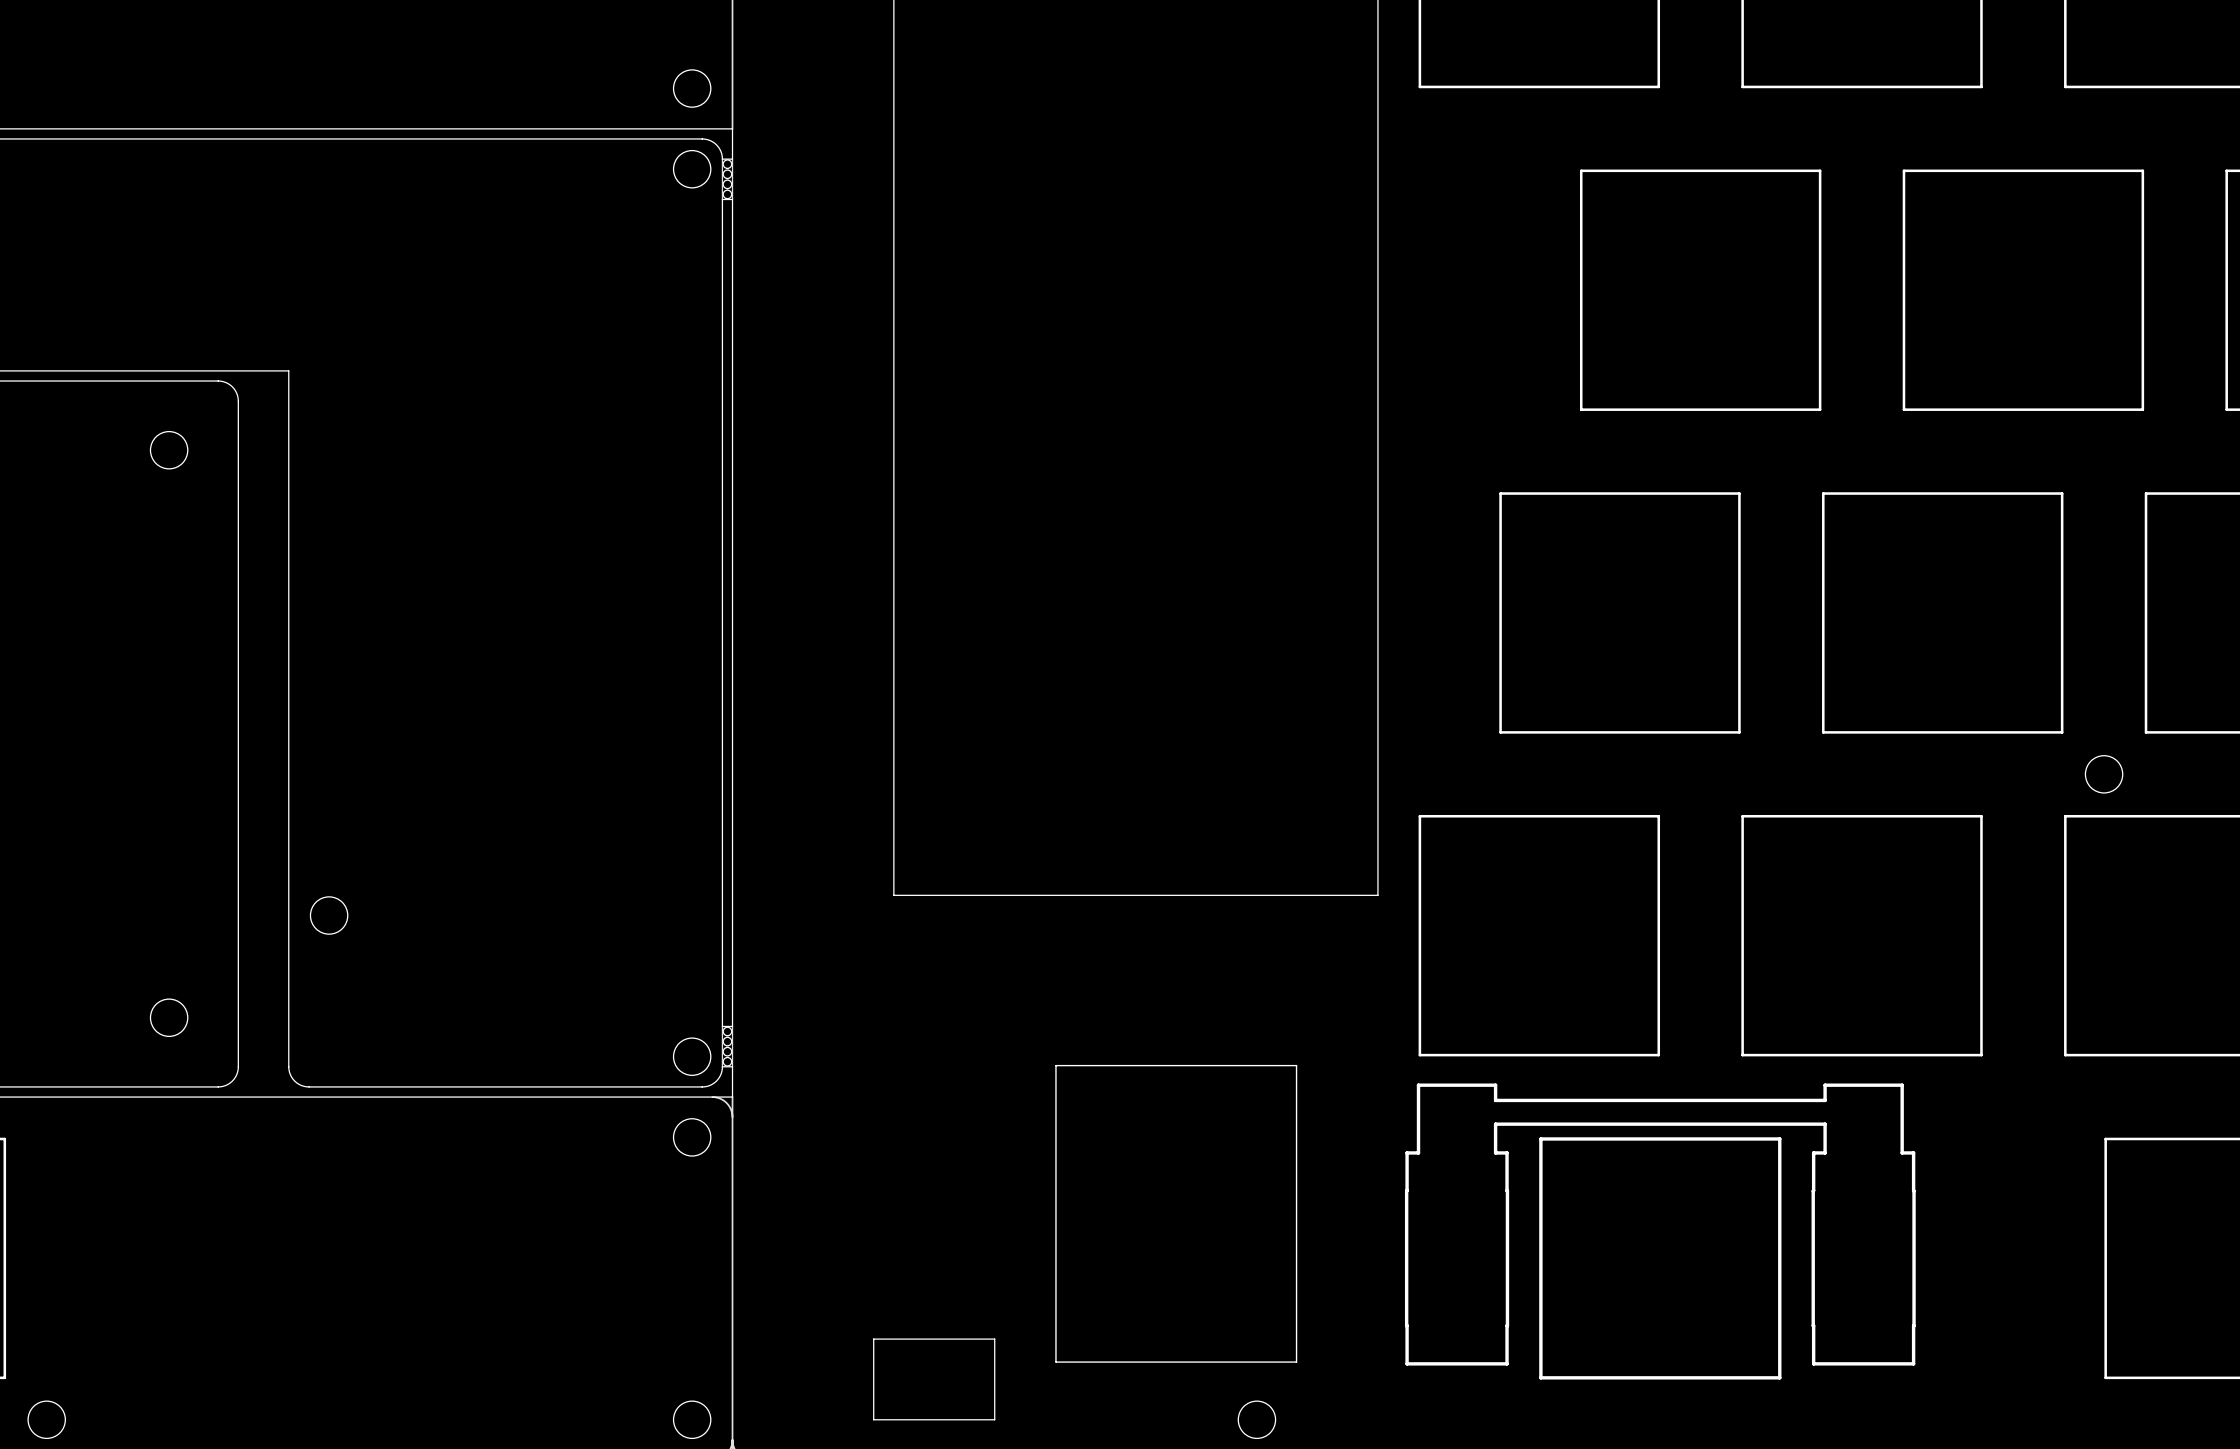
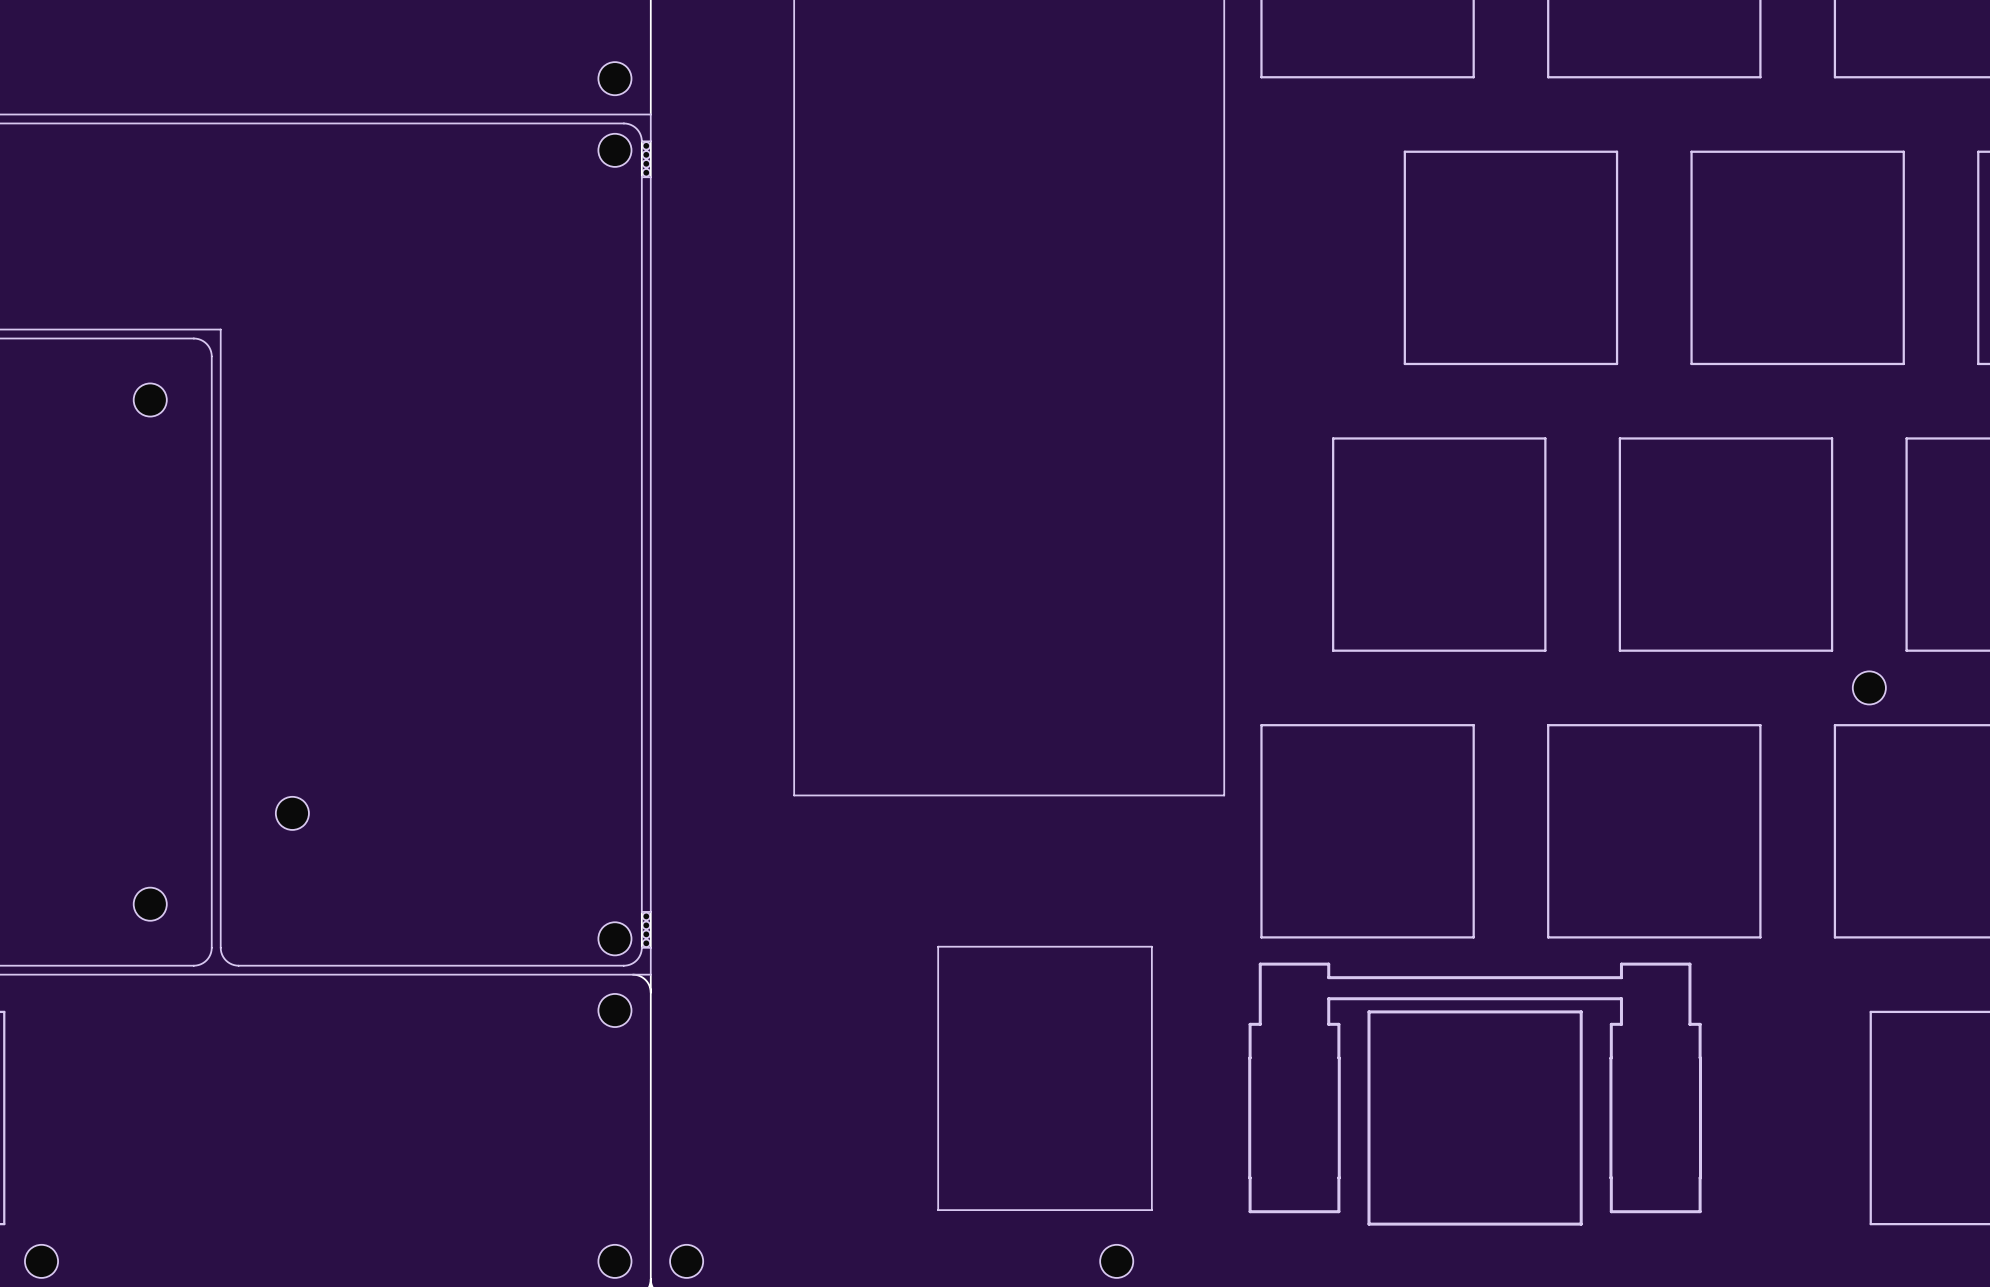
board edge: (248, 370) (288, 370) (288, 1066) (290, 1074) (294, 1081) (301, 1085) (308, 1086) -> (220, 329) (220, 950) (225, 960) (234, 965) (274, 965)
board edge: (994, 1339) (994, 1419) (873, 1419) (873, 1339) (994, 1339) -> none
part: none -> (686, 1261)

